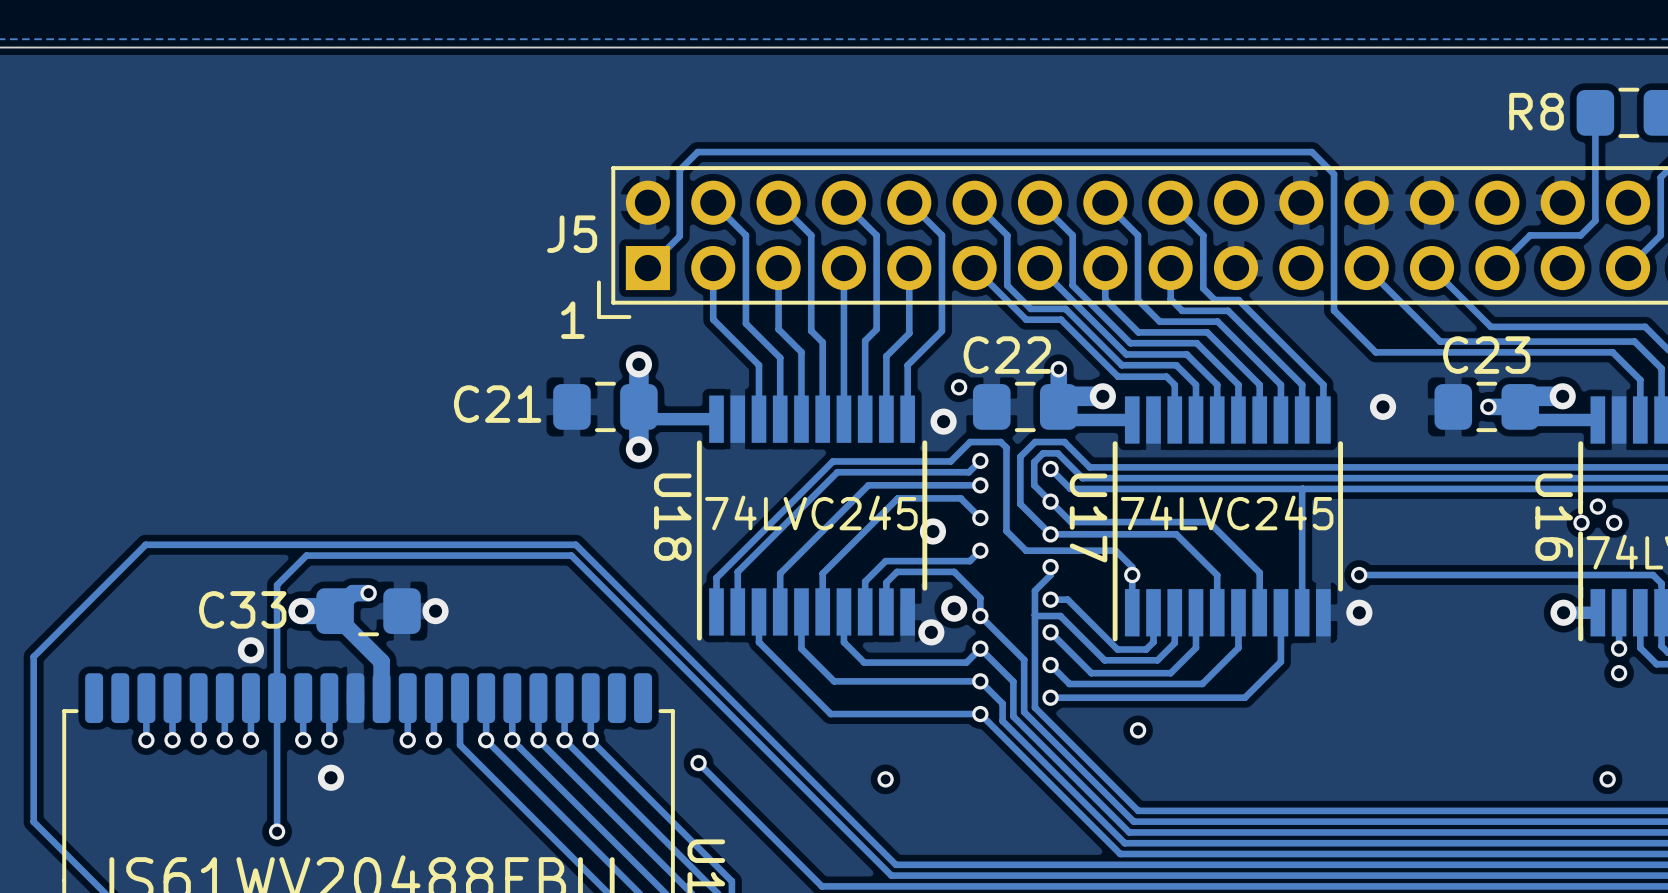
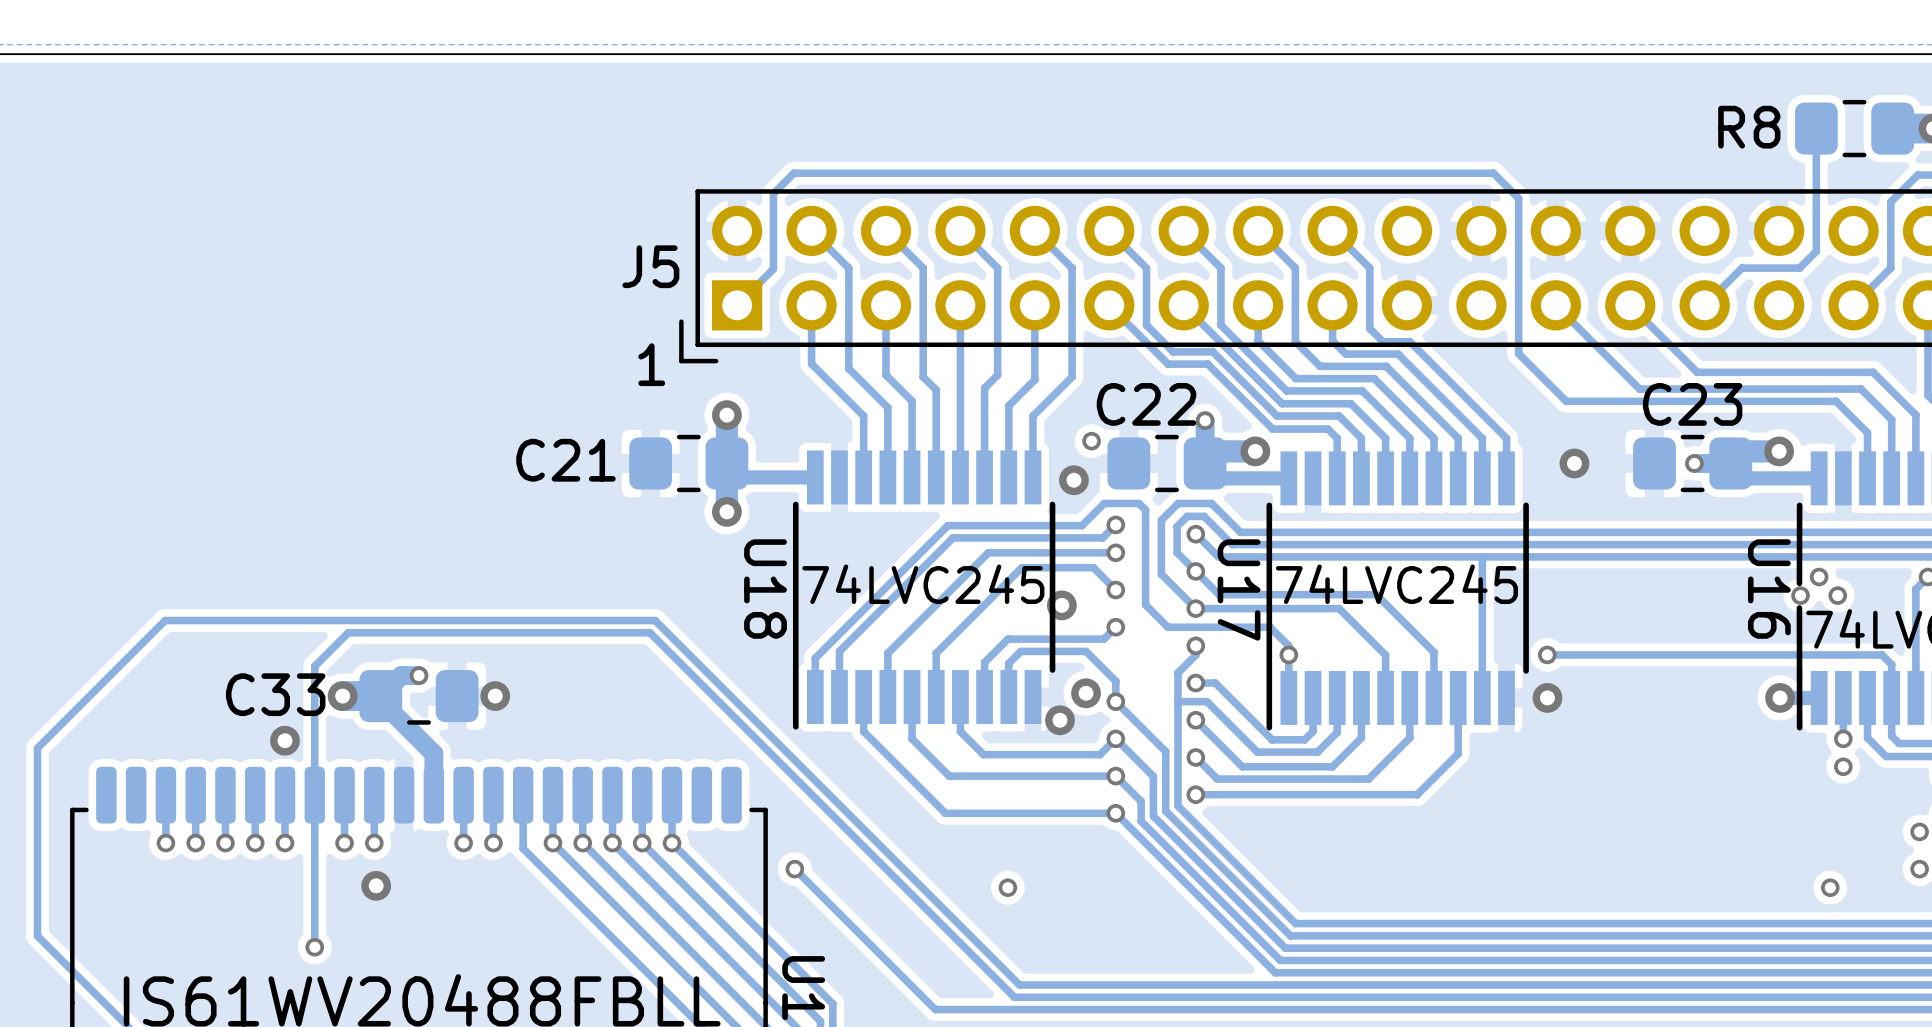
via: (1138, 730) -> none

